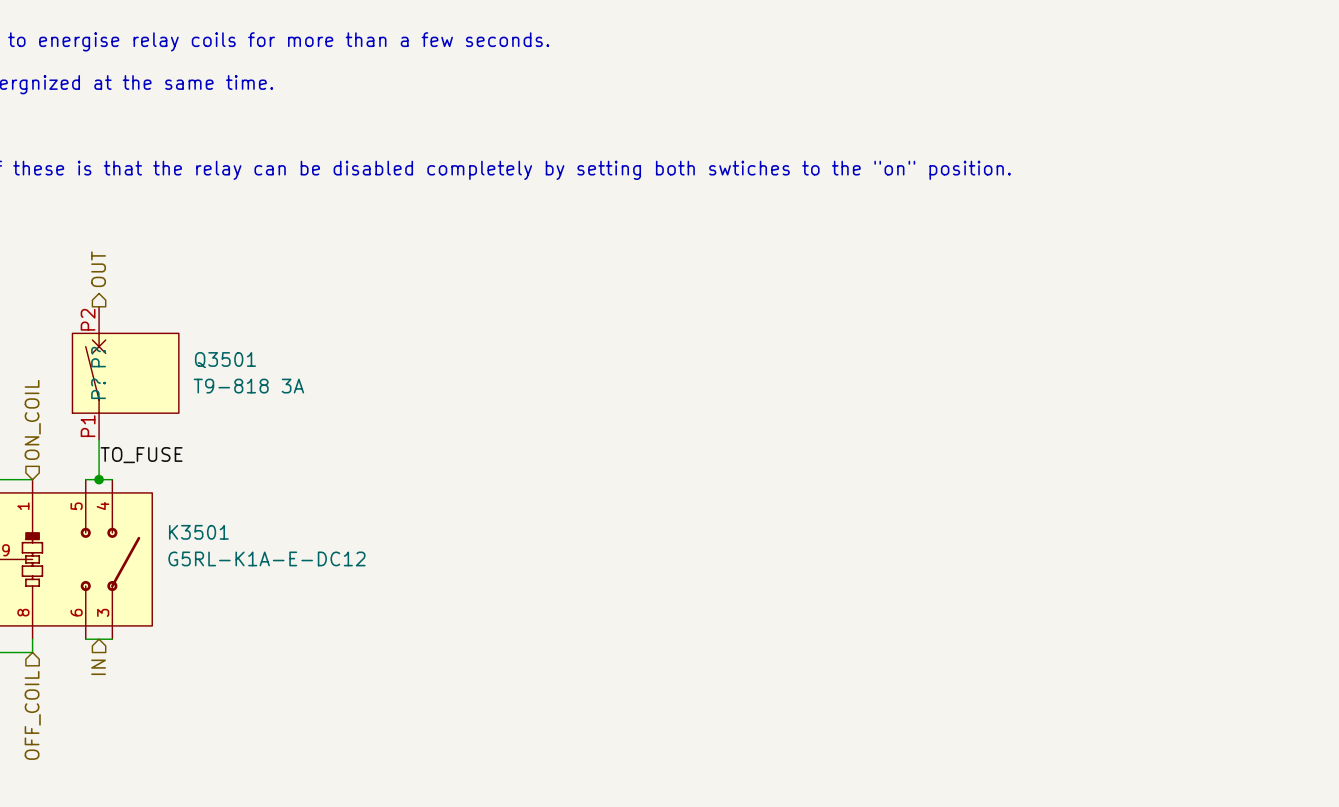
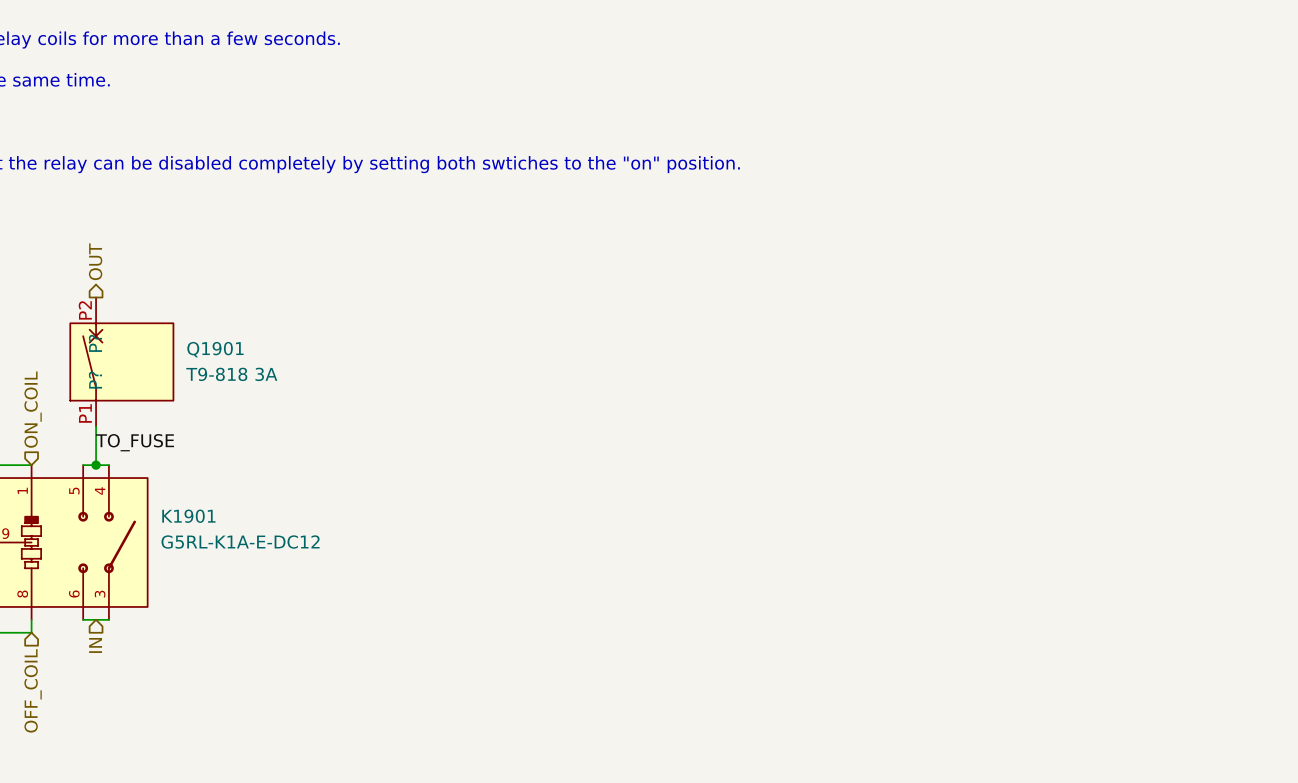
Q3501 name: Q3501 (225, 360) -> Q1901 (215, 349)
K3501 name: K3501 (198, 532) -> K1901 (188, 516)

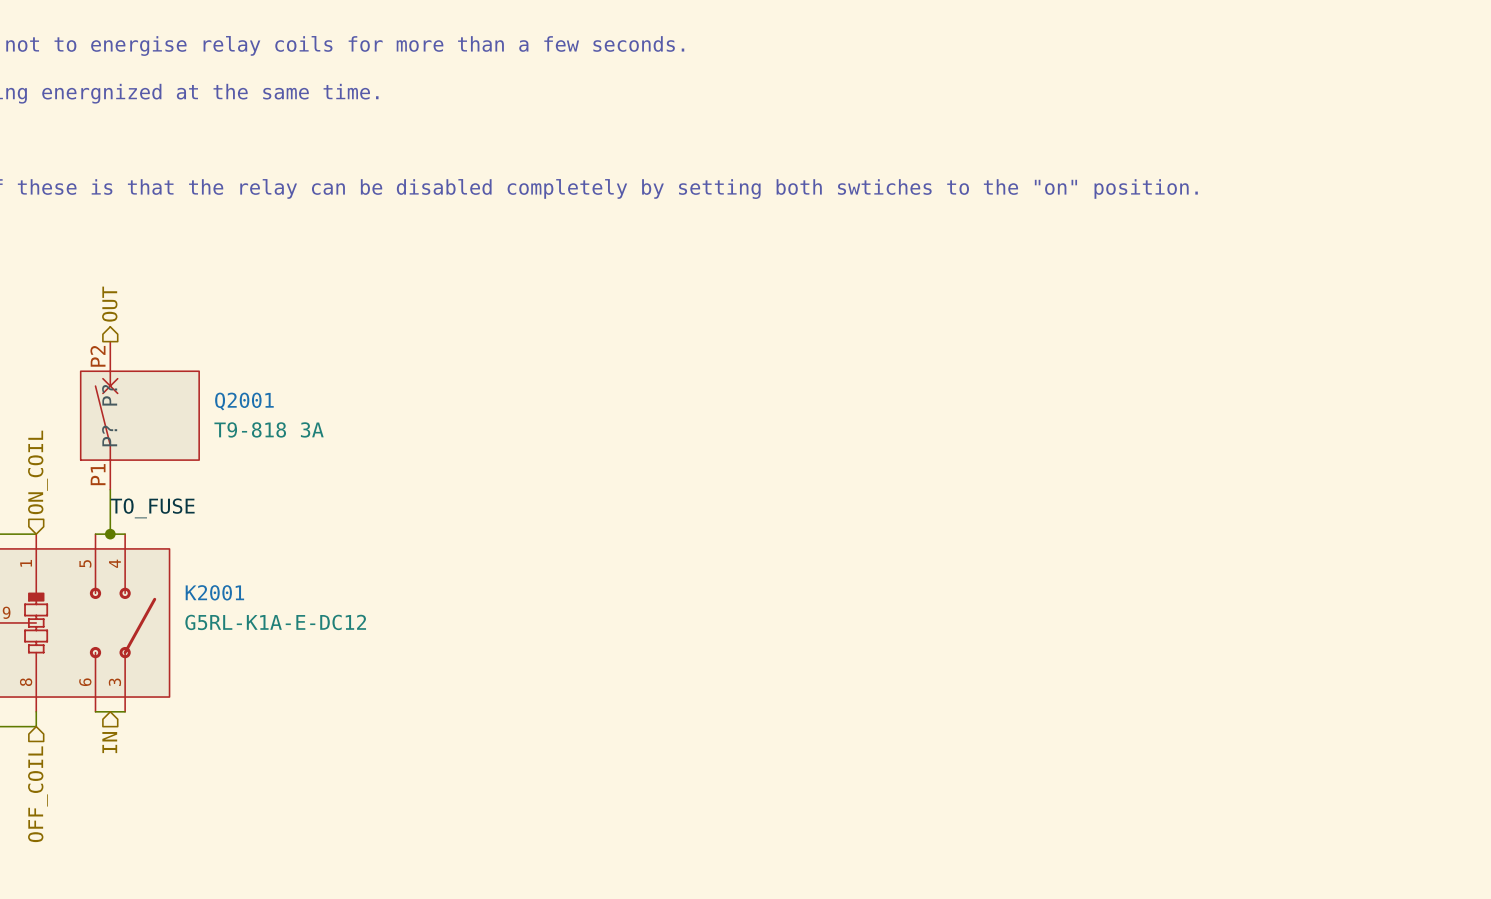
Q1901 name: Q1901 (215, 349) -> Q2001 (244, 401)
K1901 name: K1901 (188, 516) -> K2001 (214, 592)

